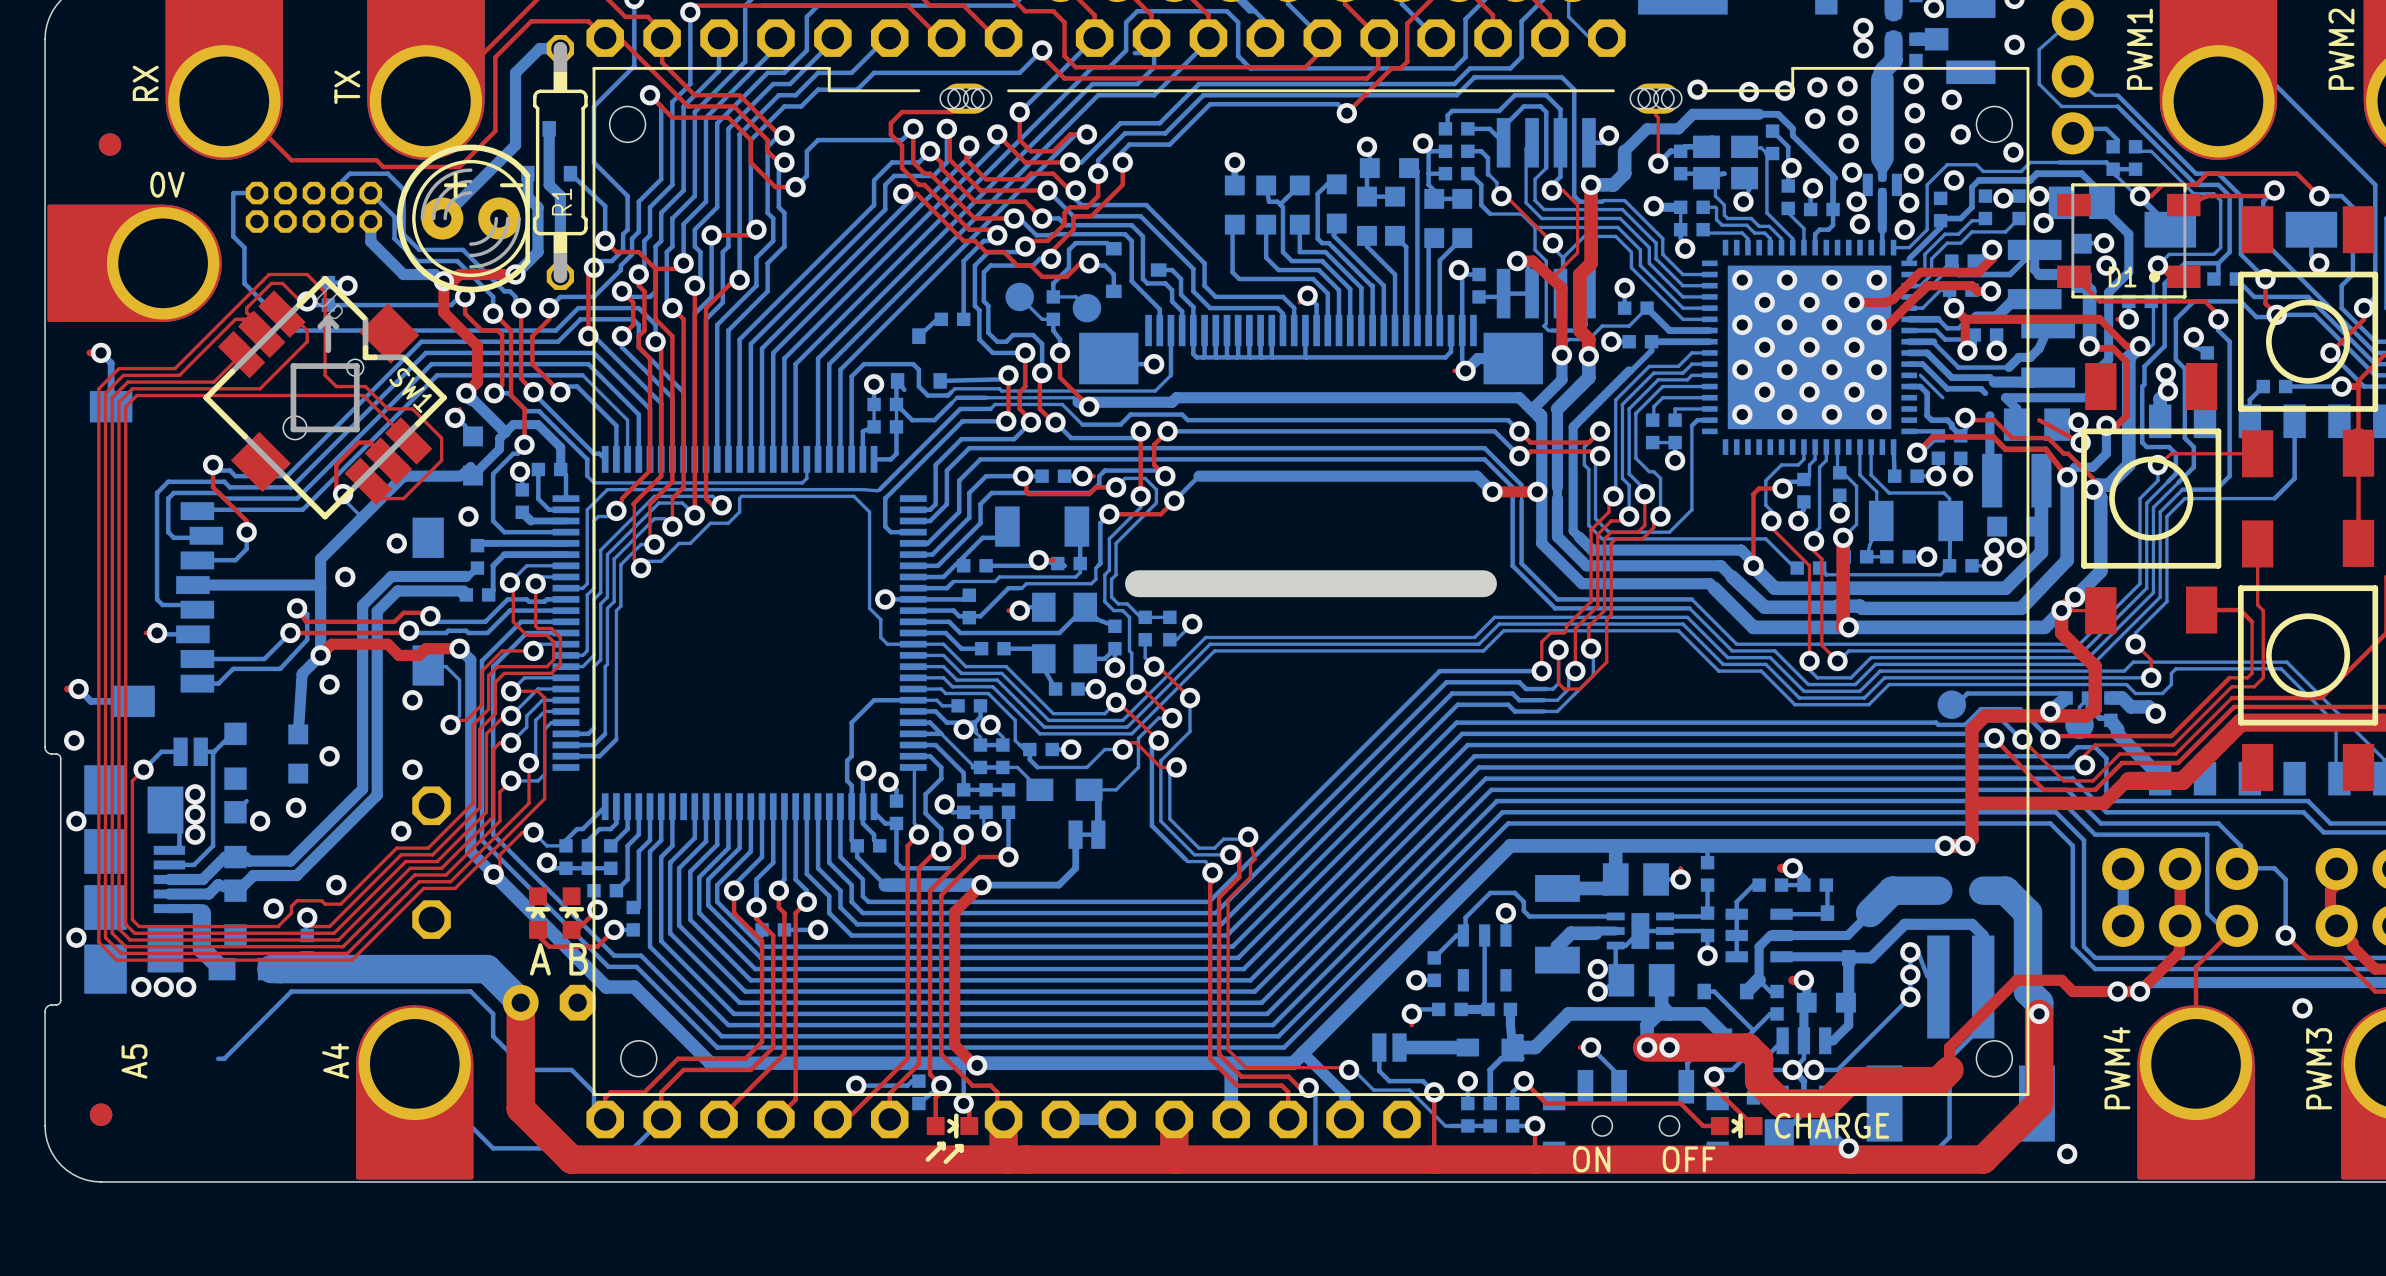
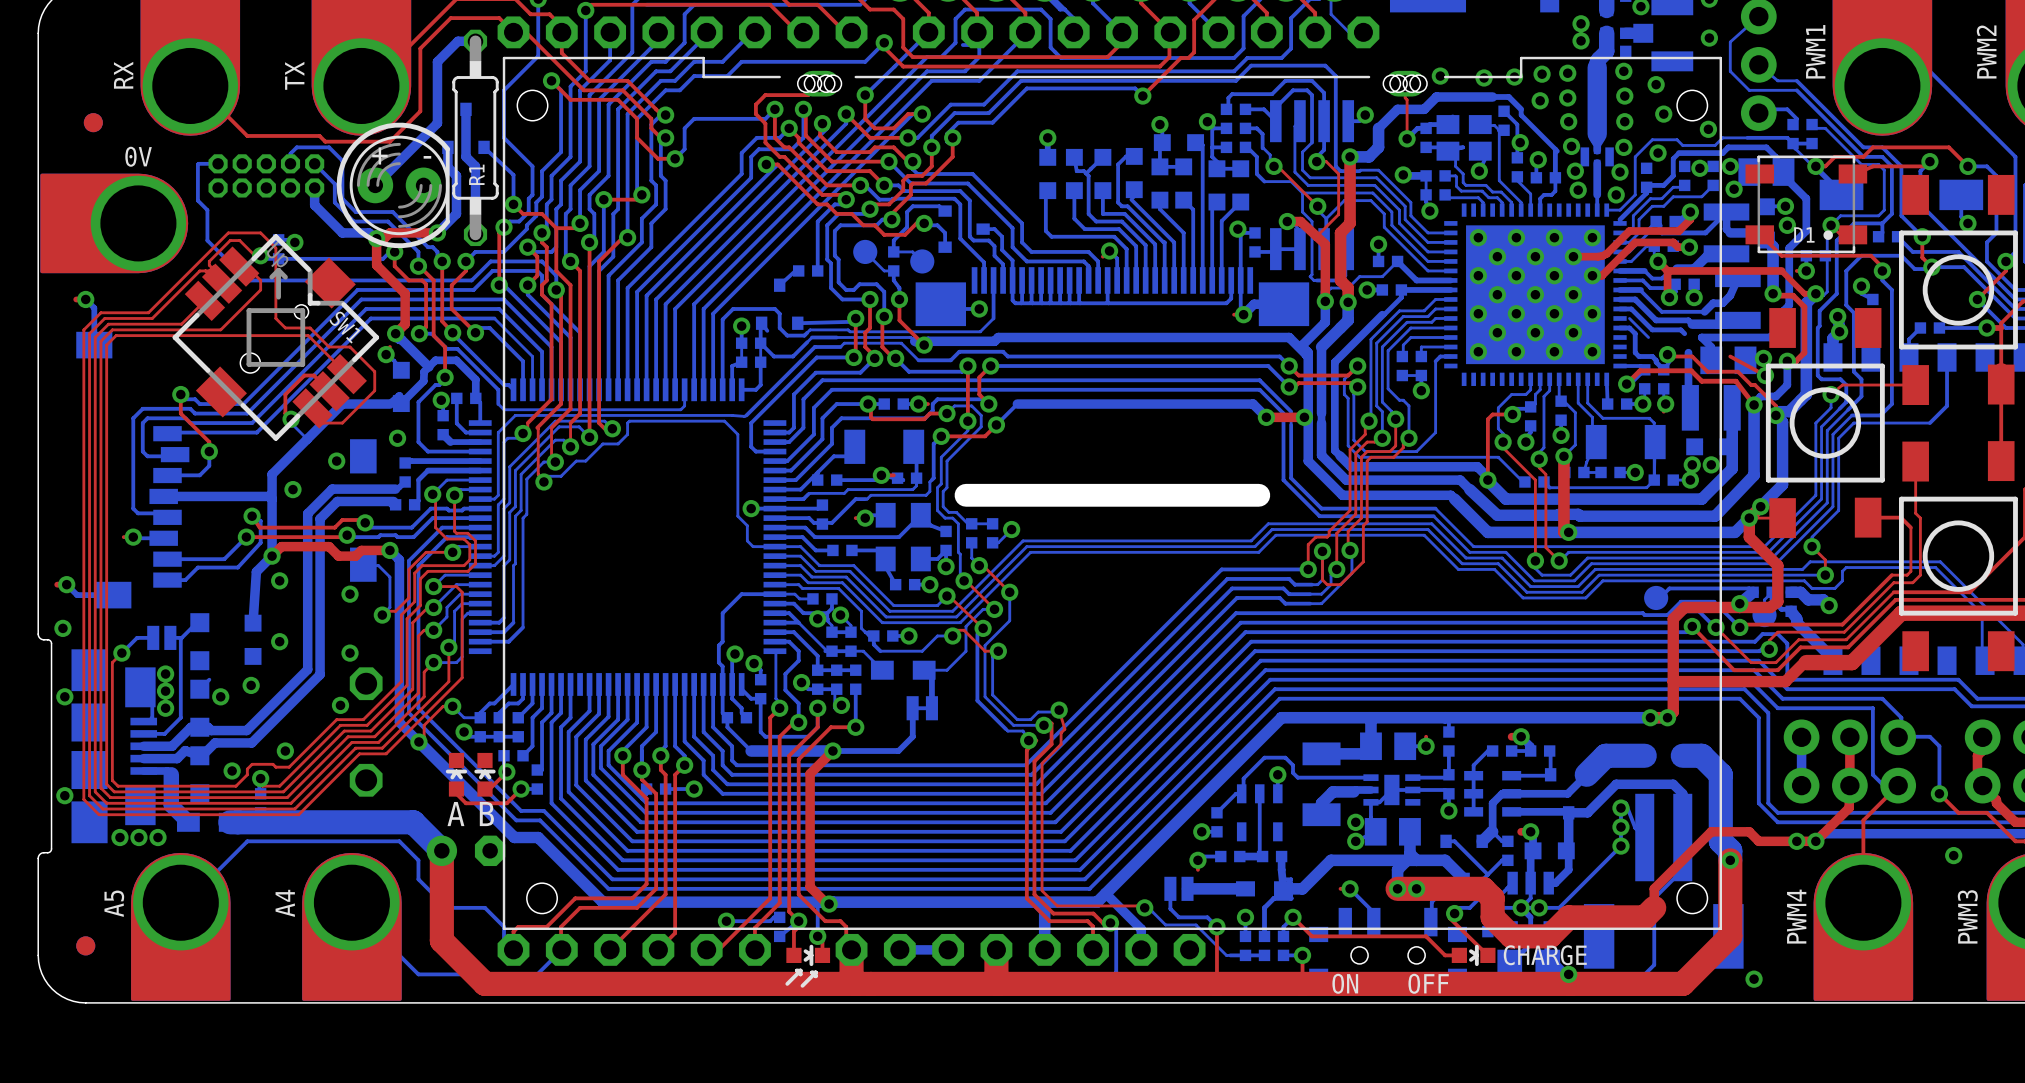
part: none -> (180, 926)

